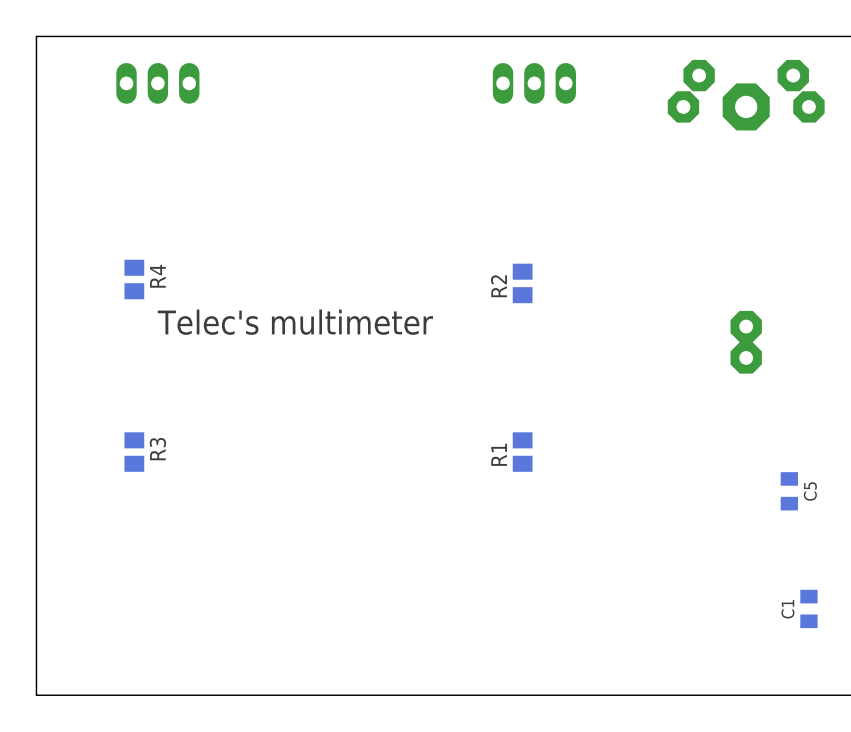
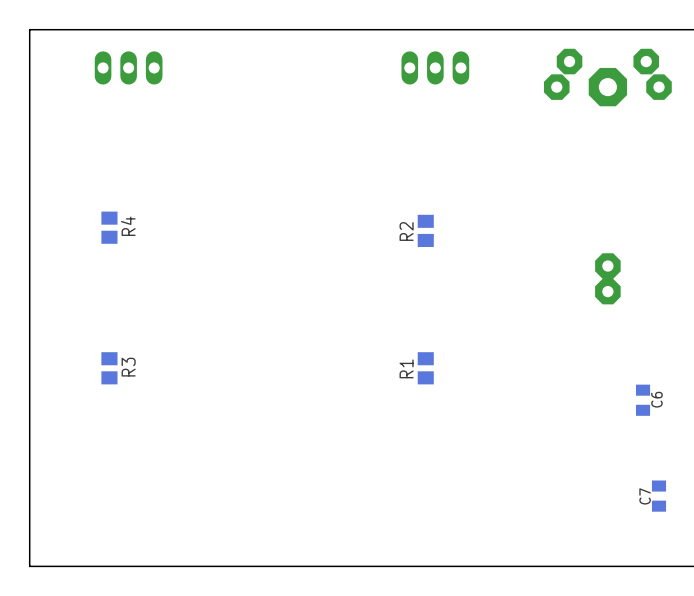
text: Telec's multimeter (295, 322) -> none
C5 name: C5 (810, 491) -> C6 (656, 399)
C1 name: C1 (787, 609) -> C7 (645, 496)

